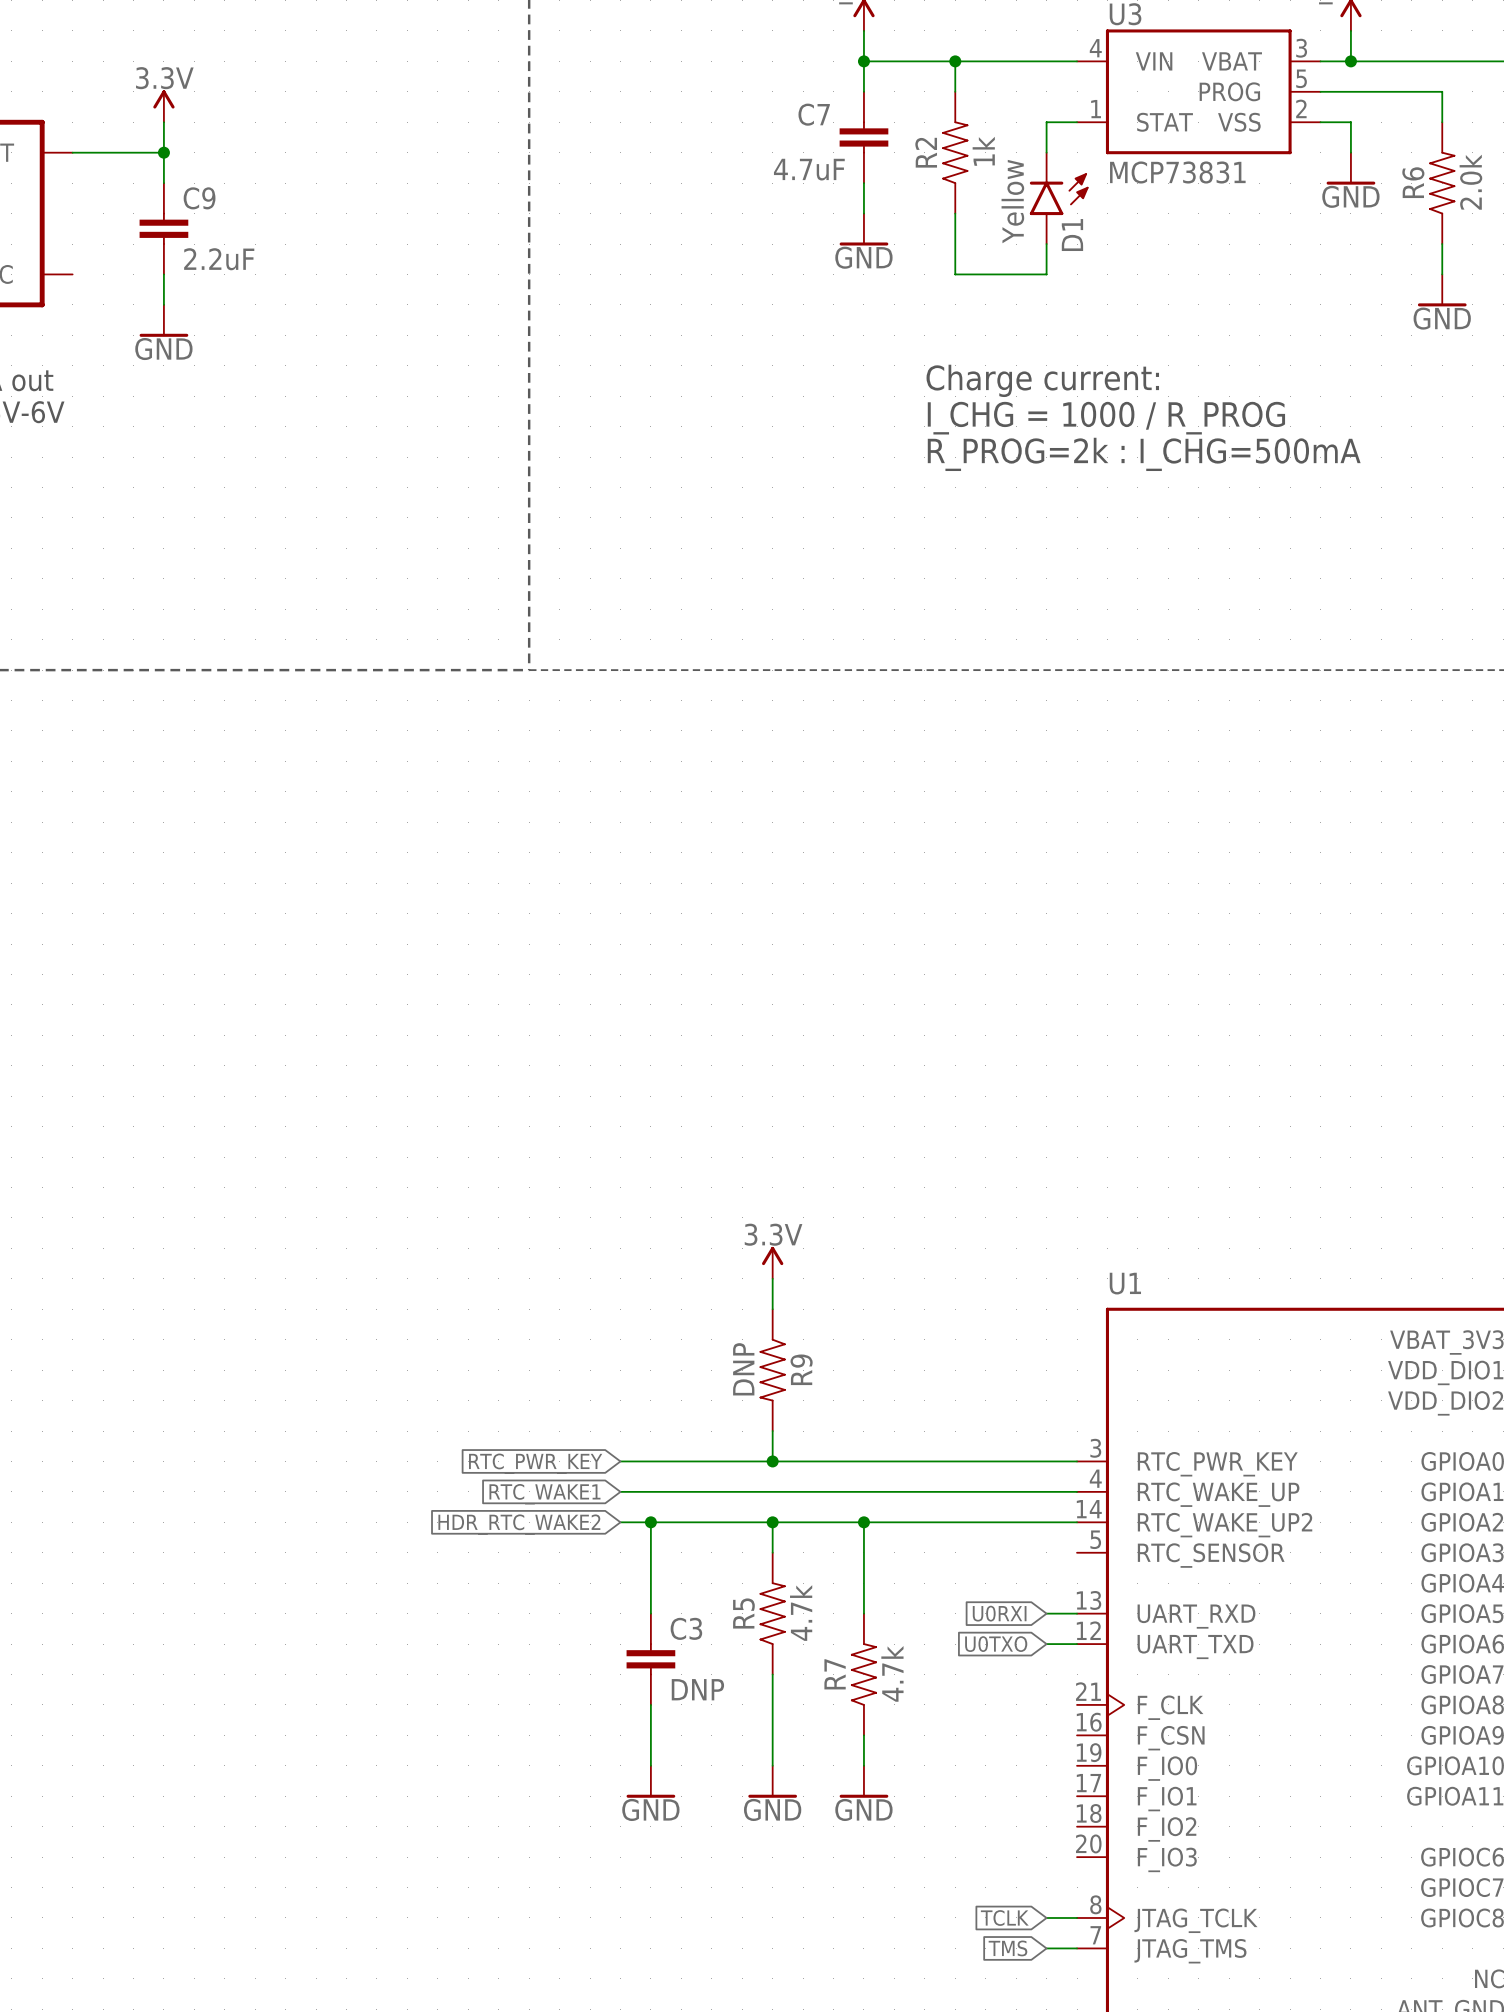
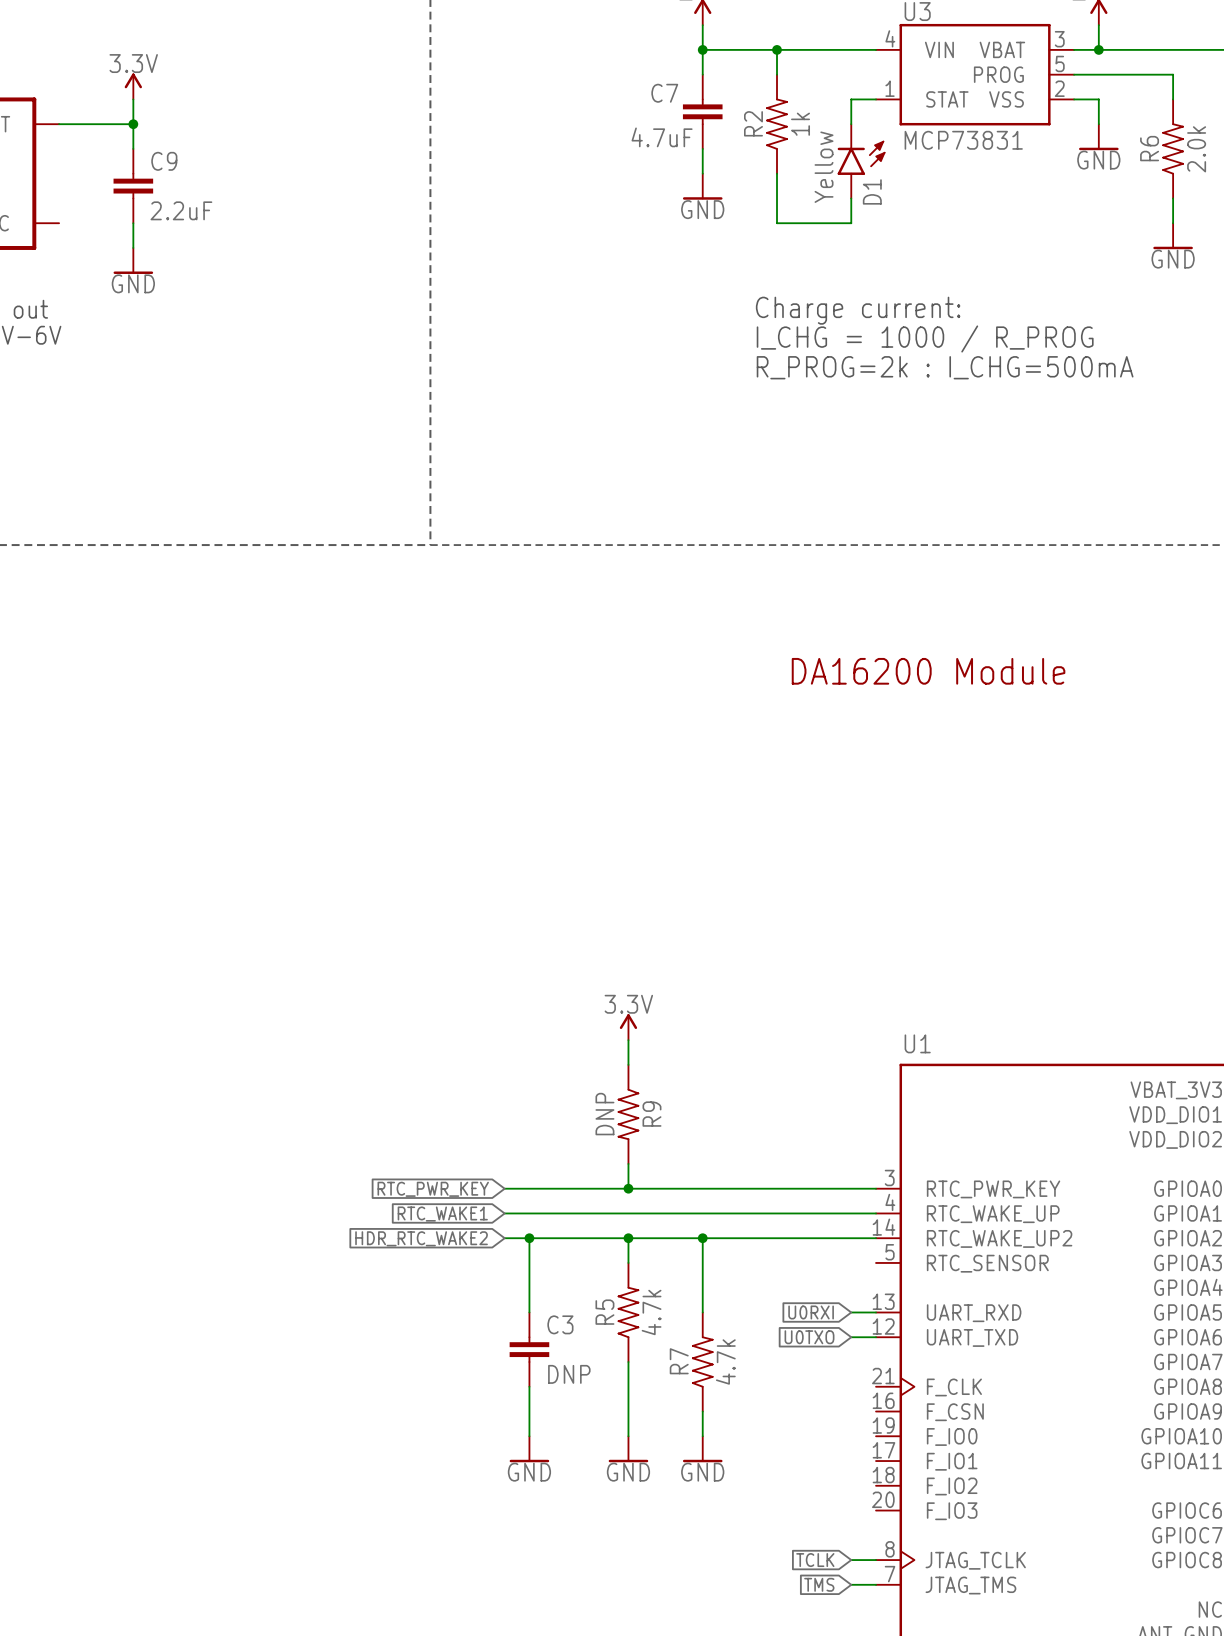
text: none -> DA16200 Module (928, 671)

